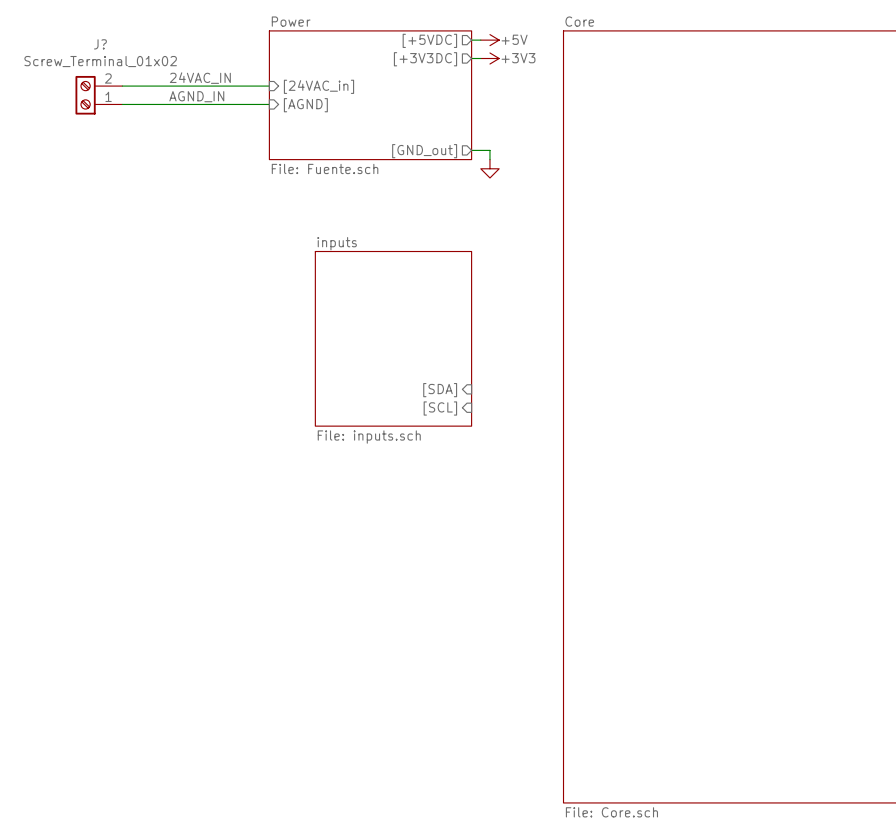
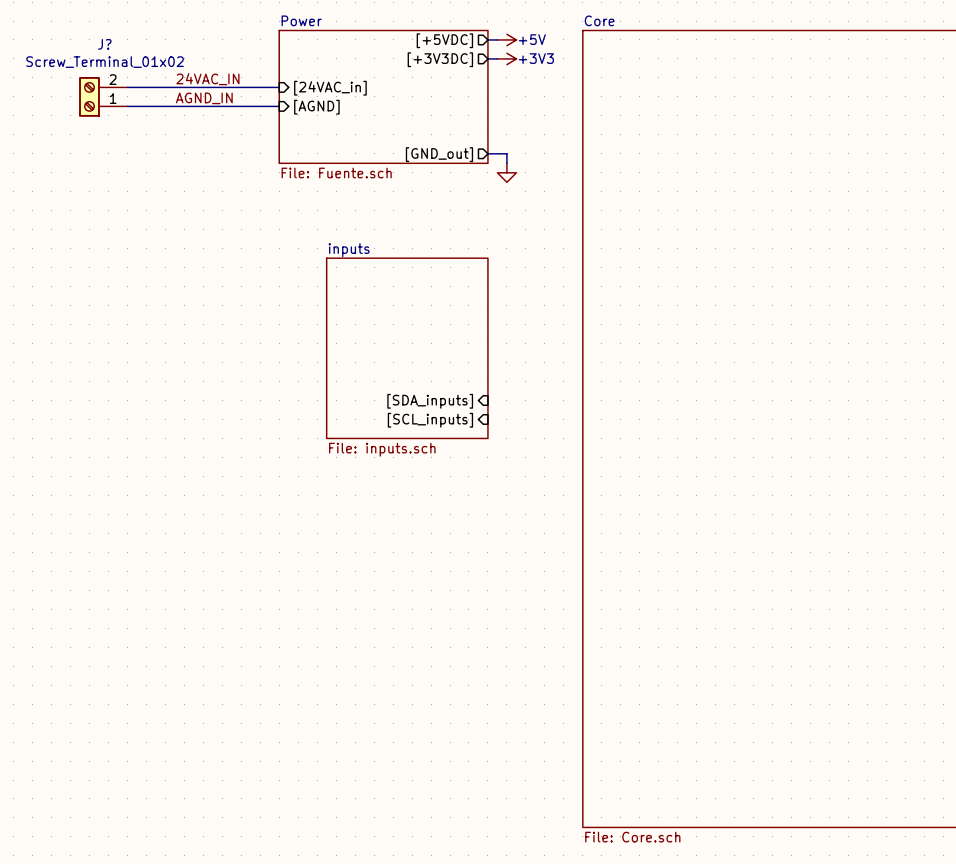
sheet pin: [SDA] (440, 390) -> [SDA_inputs] (430, 401)
sheet pin: [SCL] (440, 408) -> [SCL_inputs] (430, 420)

